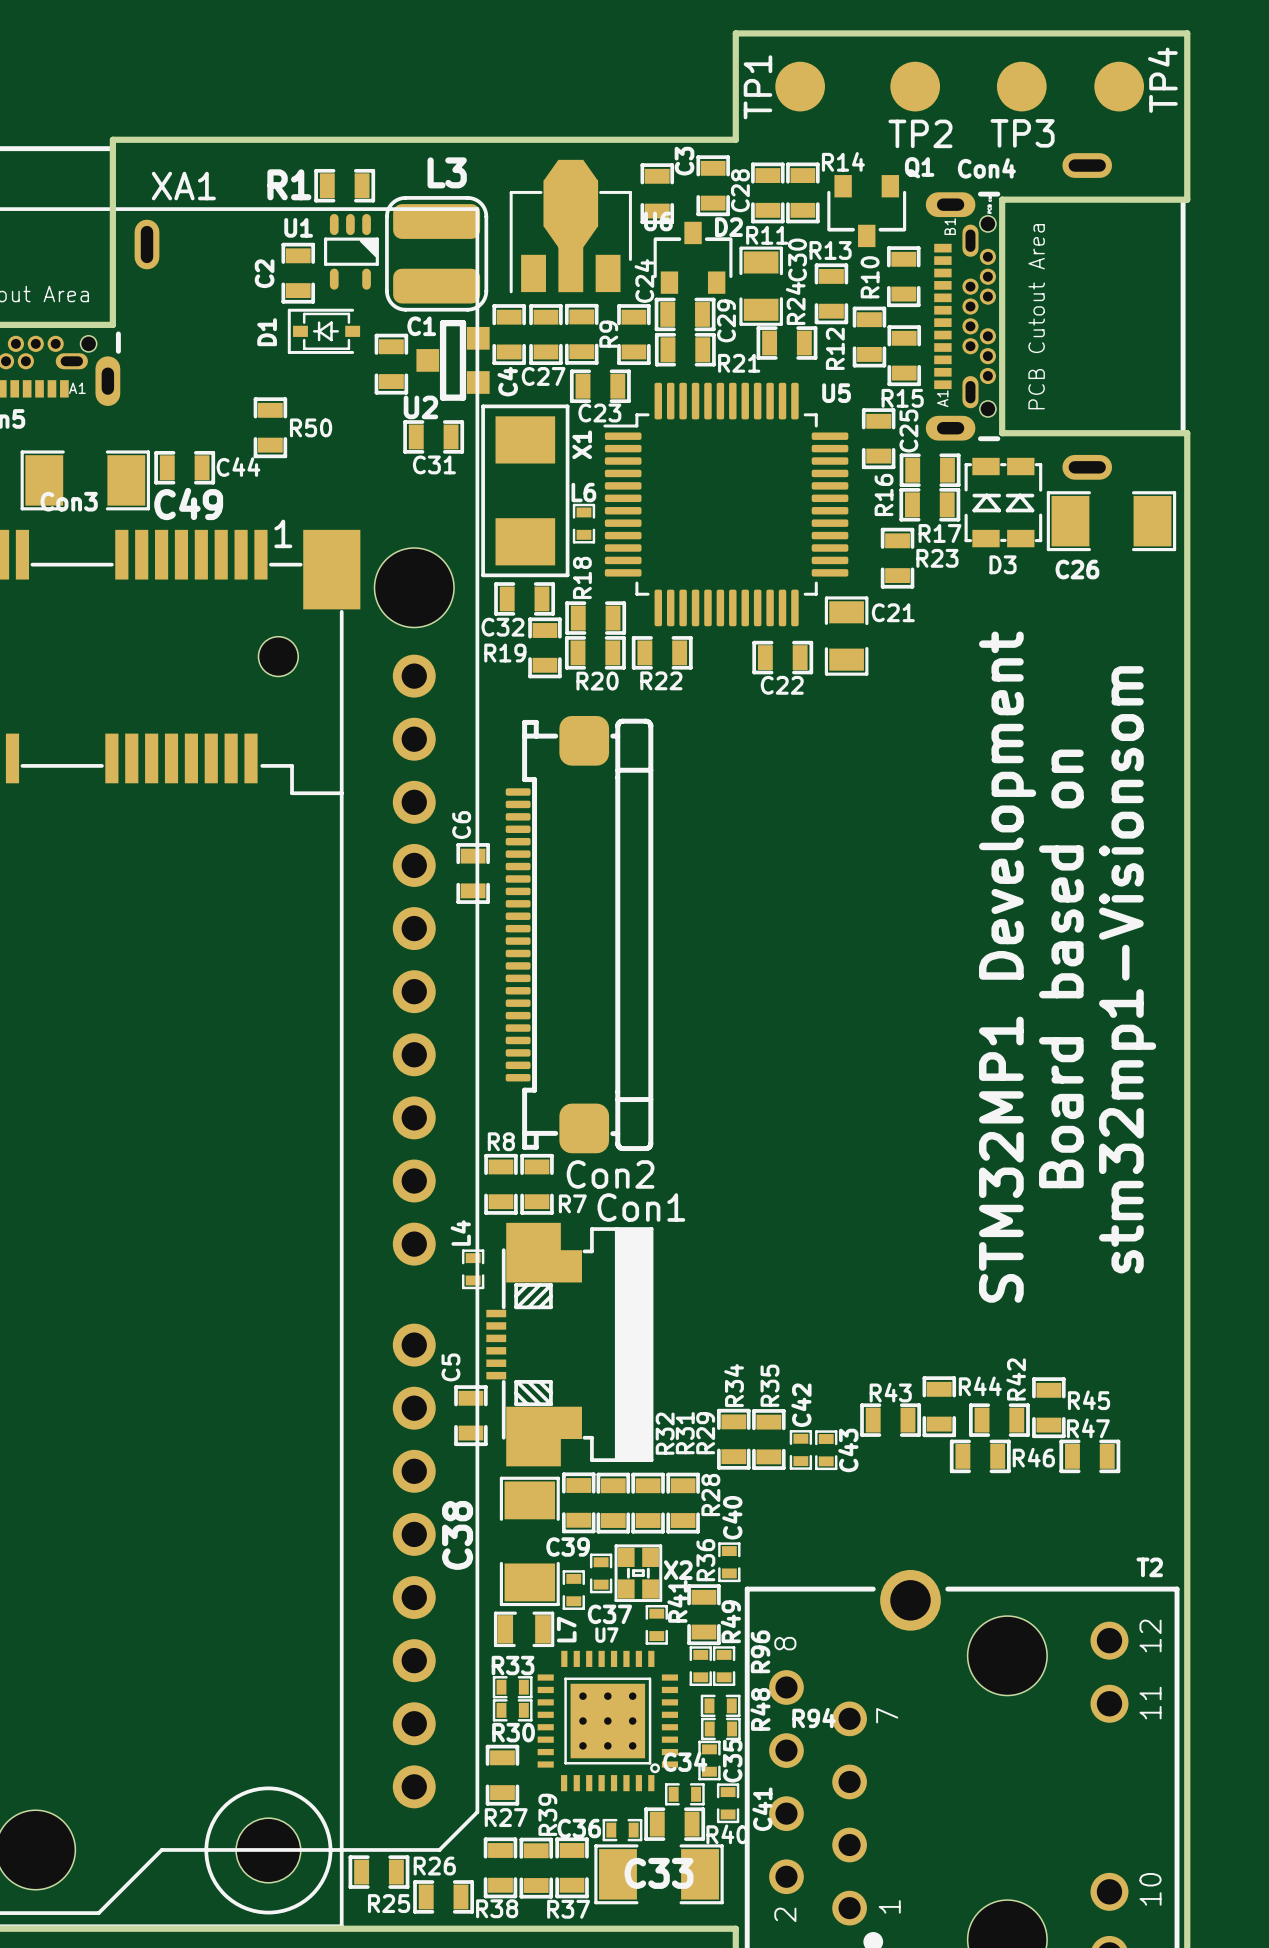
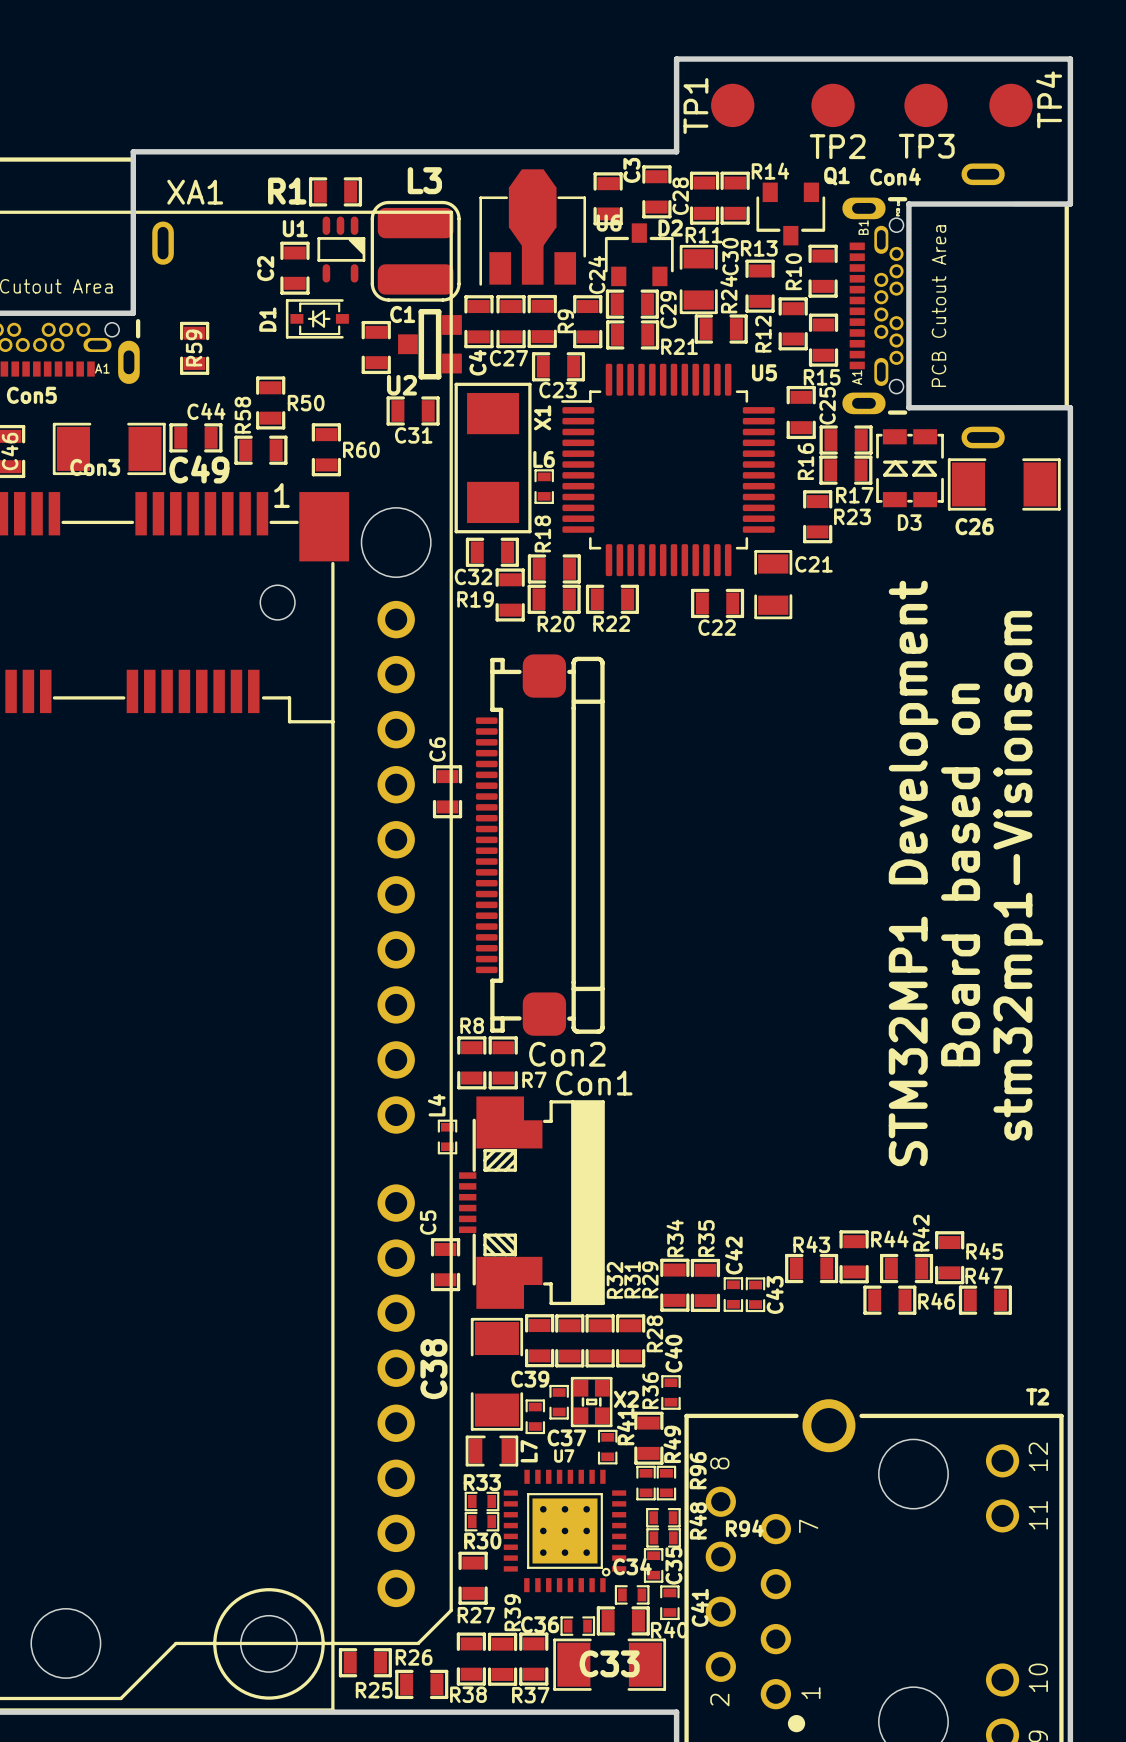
R59: none -> (194, 348)
C44 name position: C44 (238, 467) -> C44 (206, 411)
R58: none -> (260, 450)
R60: none -> (326, 449)

